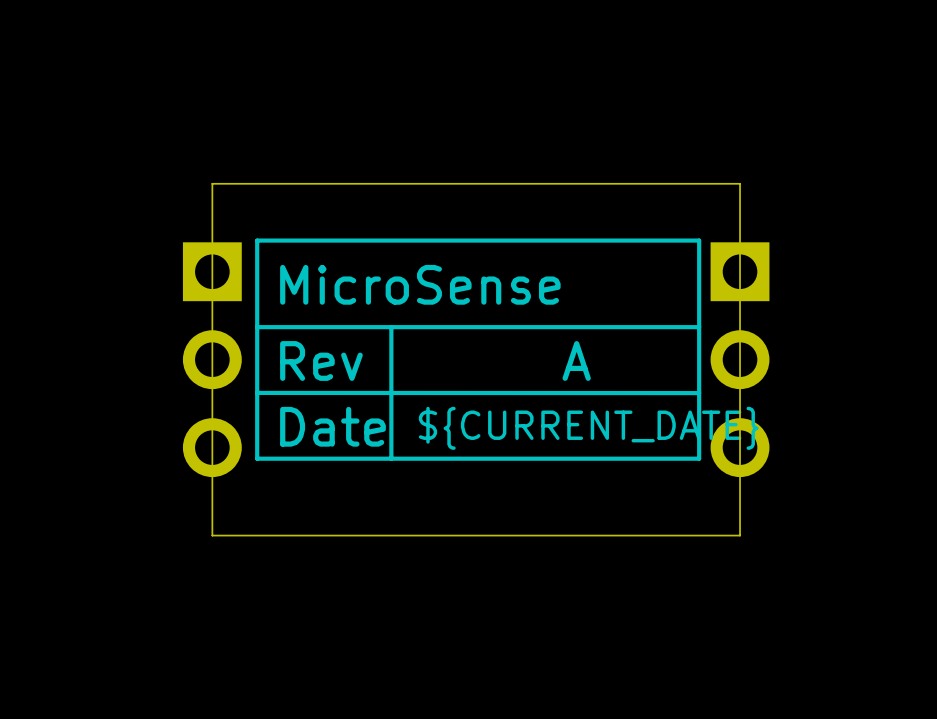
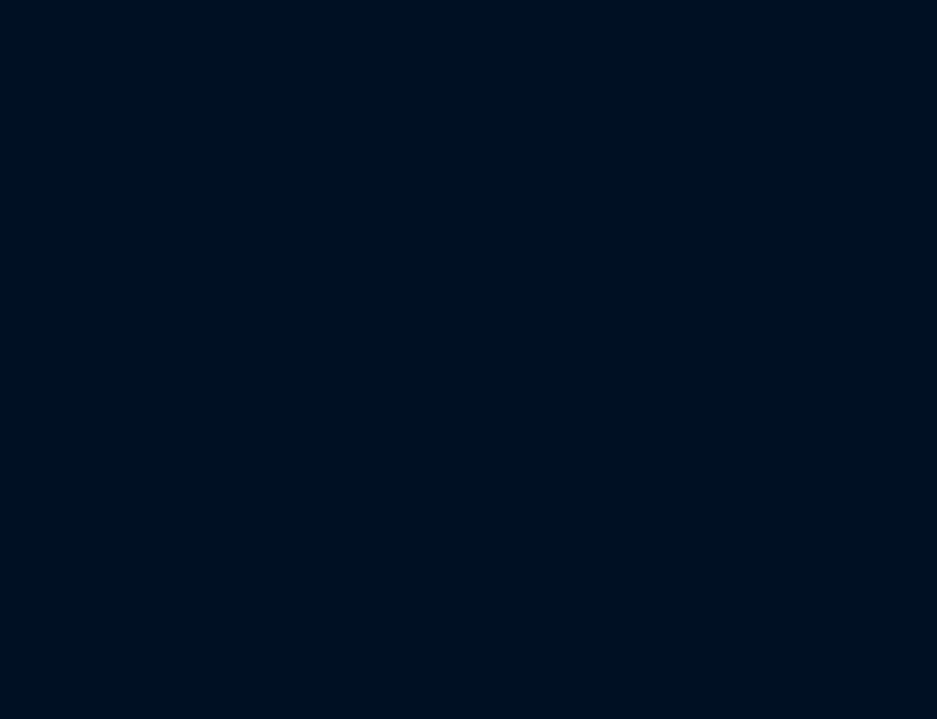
board edge: (740, 183) (212, 183) (212, 535) (740, 535) (740, 183) -> none
line: (699, 240) (257, 240) (257, 458) (699, 458) (699, 240) -> none
text: MicroSense (420, 284) -> none
line: (391, 327) (391, 458) -> none
line: (699, 327) (257, 327) -> none
part: (212, 359) -> none
part: (740, 359) -> none
text: Rev (321, 360) -> none
text: A (576, 360) -> none
line: (257, 392) (699, 393) -> none
text: Date (332, 426) -> none
text: ${CURRENT_DATE} (588, 428) -> none

